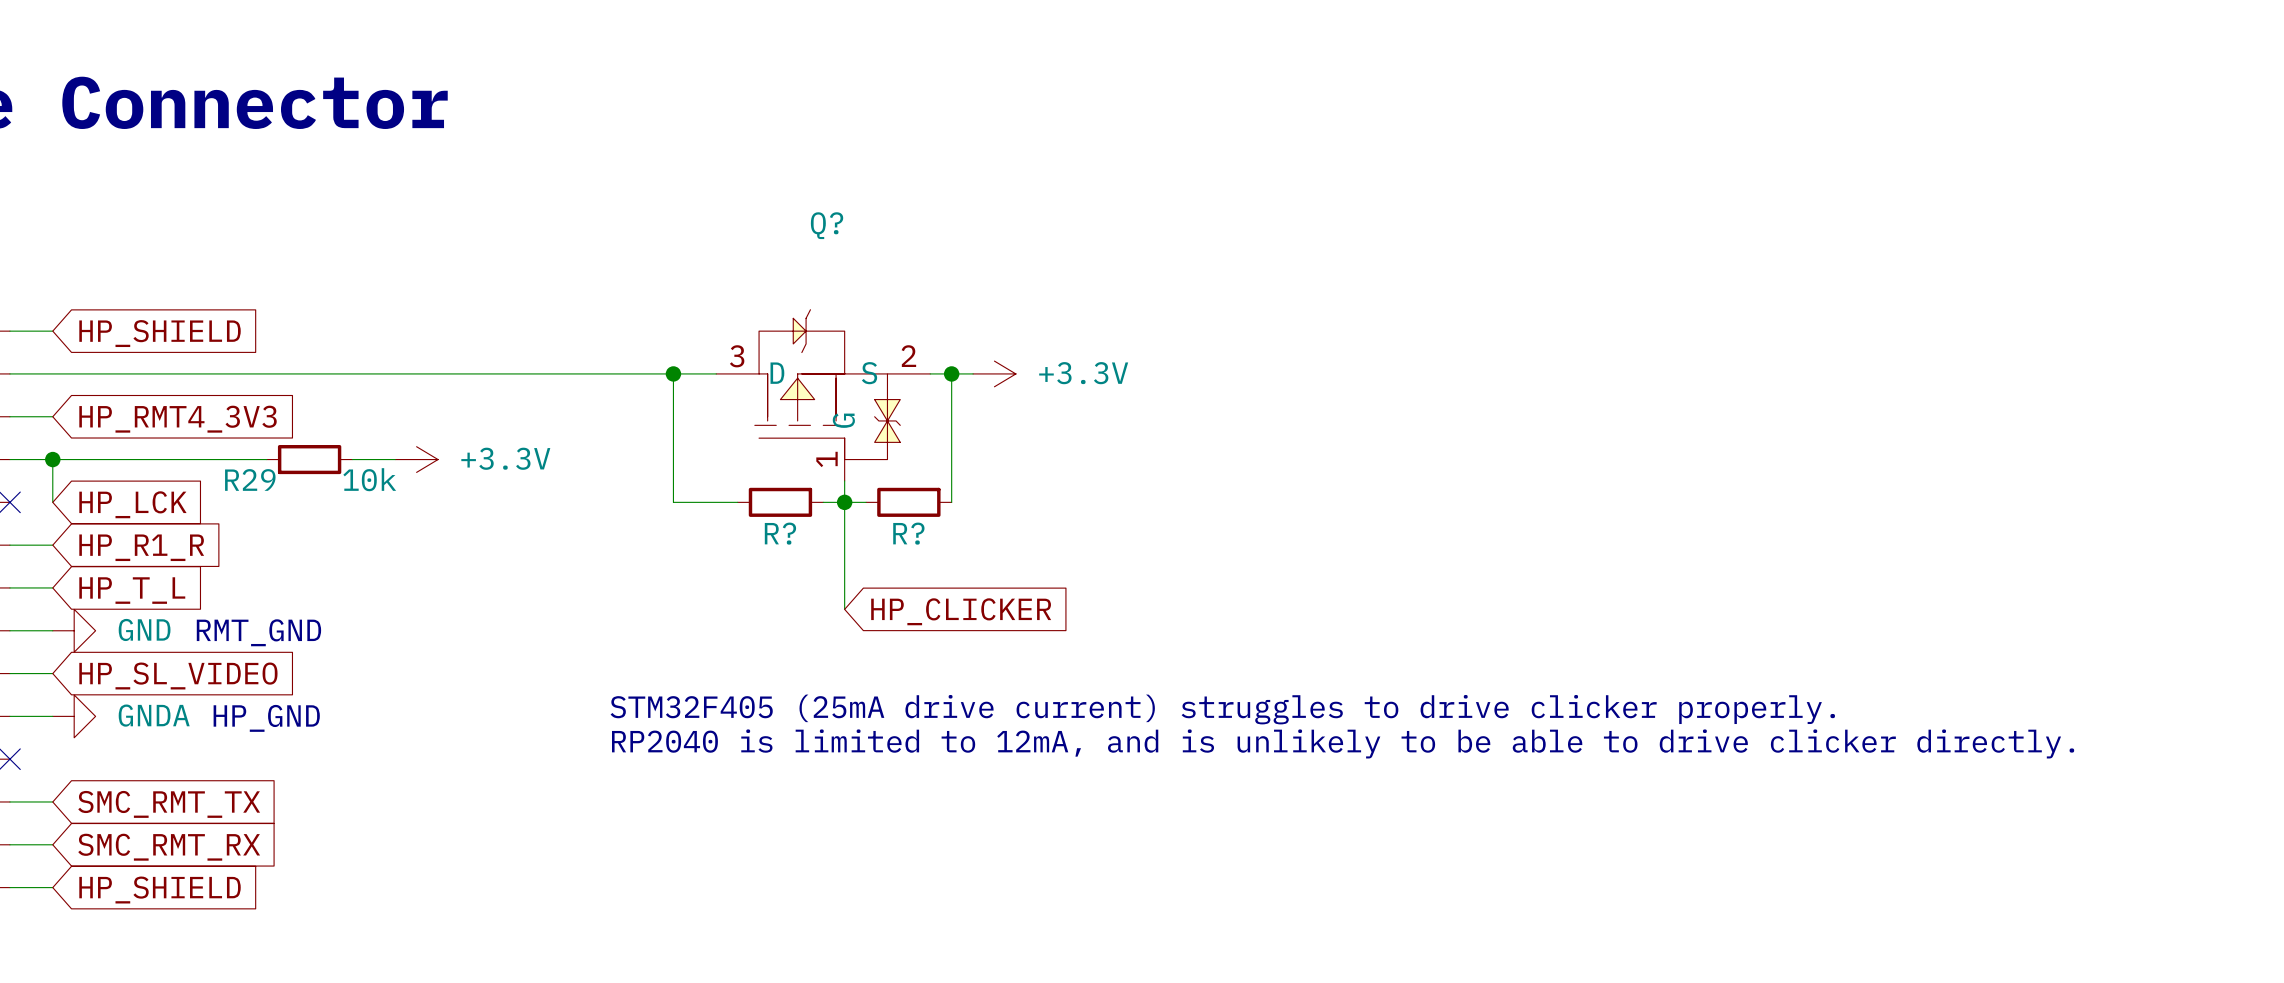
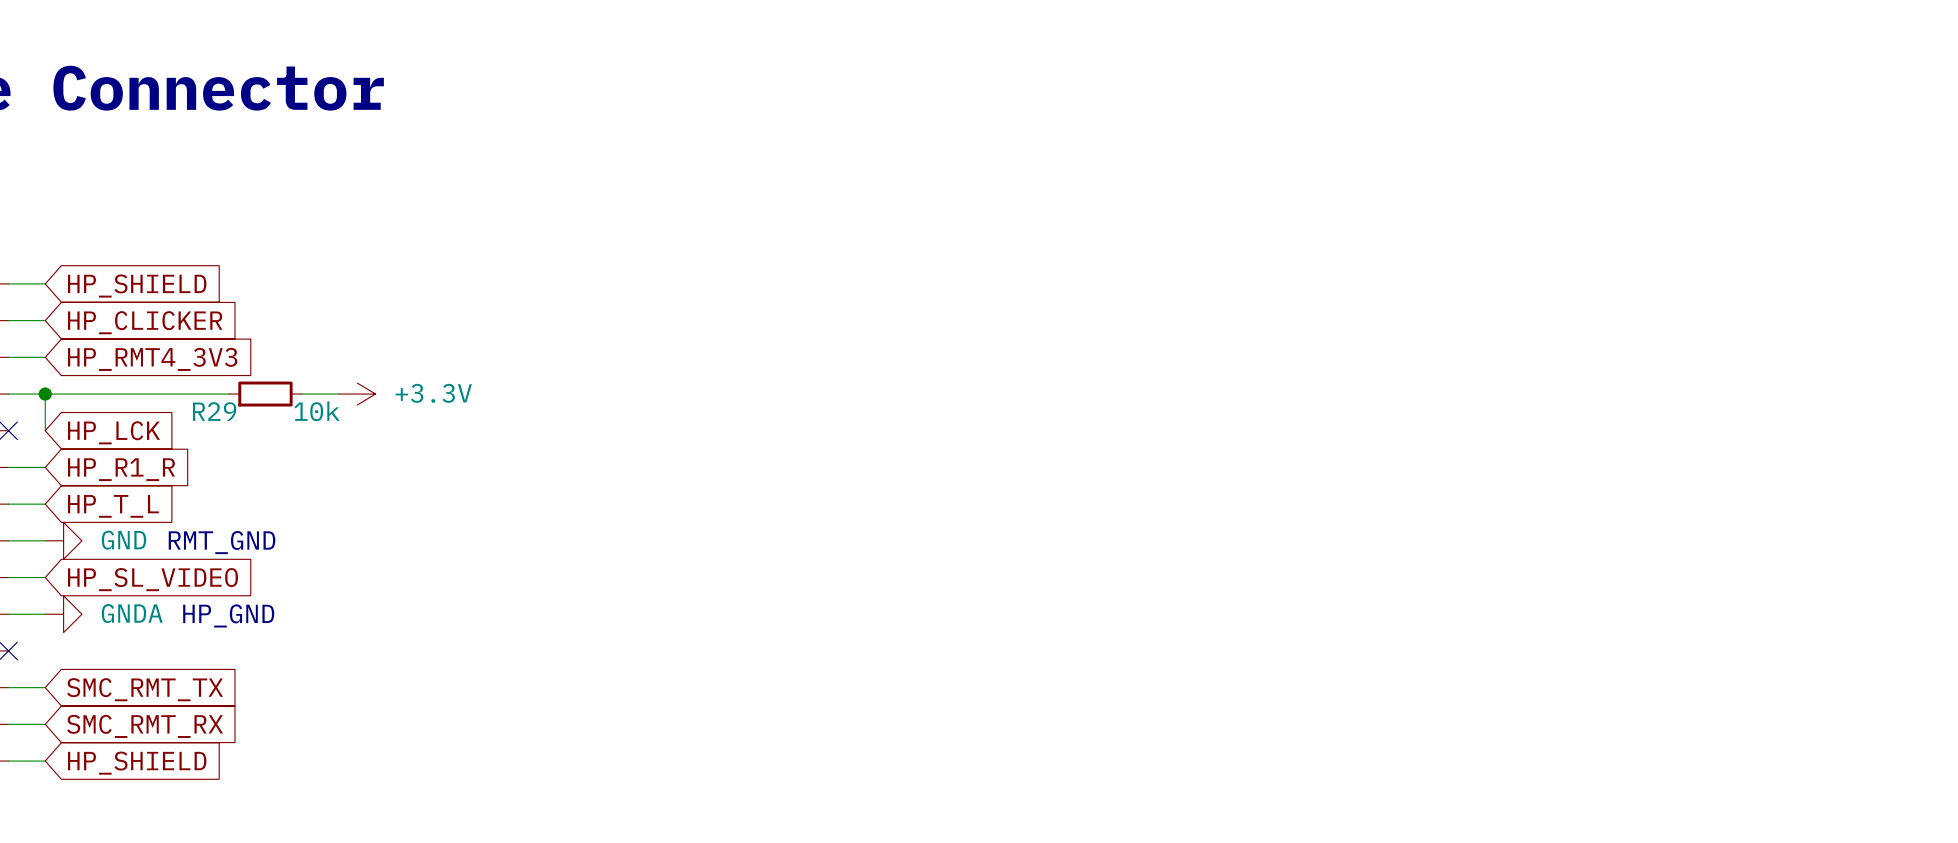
wire: (52, 373) (716, 373) -> none
wire: (673, 373) (673, 502) (737, 502) -> none
junction: (673, 373) -> none
wire: (930, 373) (973, 373) -> none
wire: (951, 373) (951, 502) -> none
junction: (951, 373) -> none
power symbol: +3.3V (994, 373) -> none
global label: none -> HP_CLICKER (145, 322)
Q?: (823, 395) -> none
wire: (844, 480) (844, 609) -> none
R?: (780, 502) -> none
wire: (823, 502) (866, 502) -> none
junction: (844, 502) -> none
R?: (908, 502) -> none
global label: HP_CLICKER (961, 611) -> none
text: STM32F405 (25mA drive current) struggles to drive clicker properly. (1222, 709) -> none
text: RP2040 is limited to 12mA, and is unlikely to be able to drive clicker directly. (1343, 743) -> none

